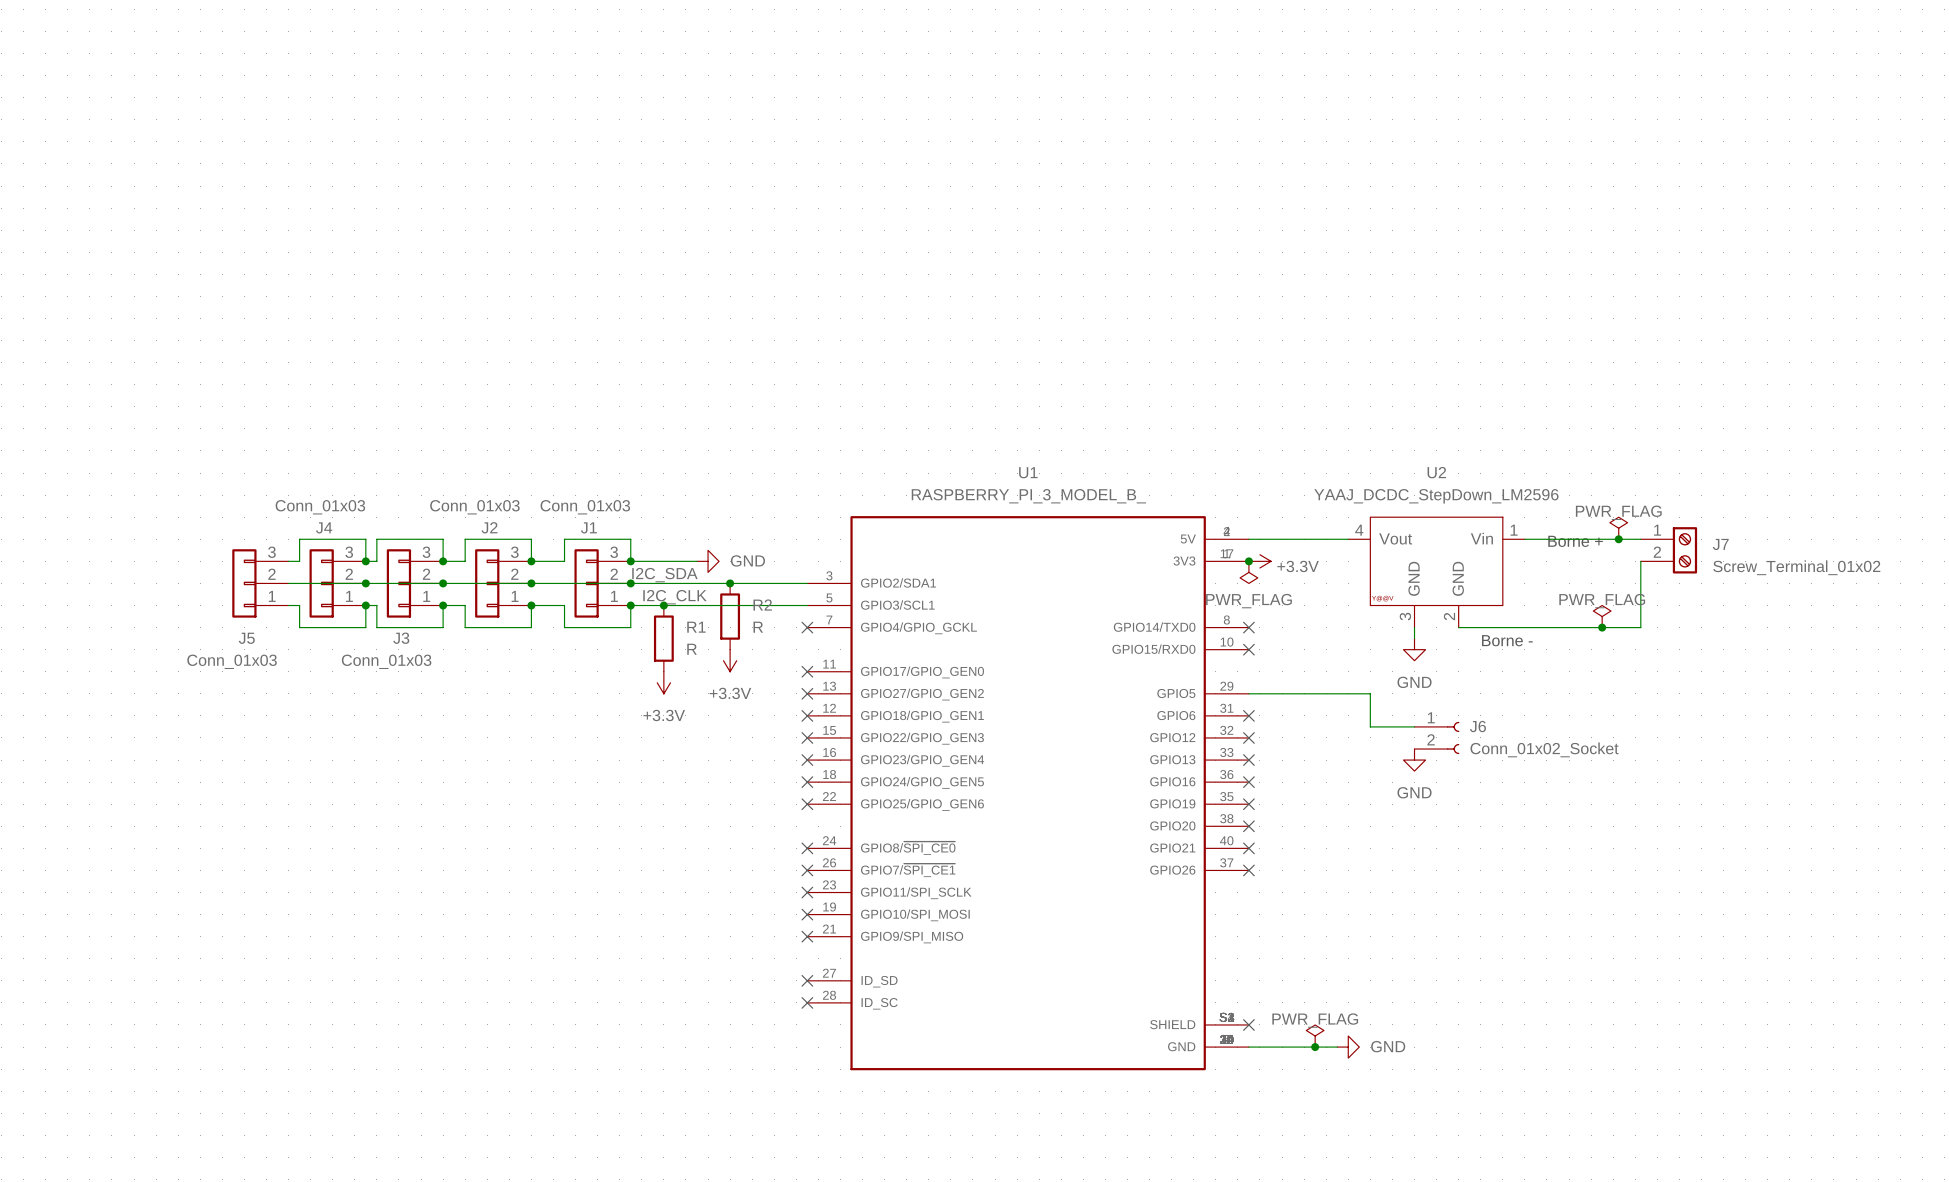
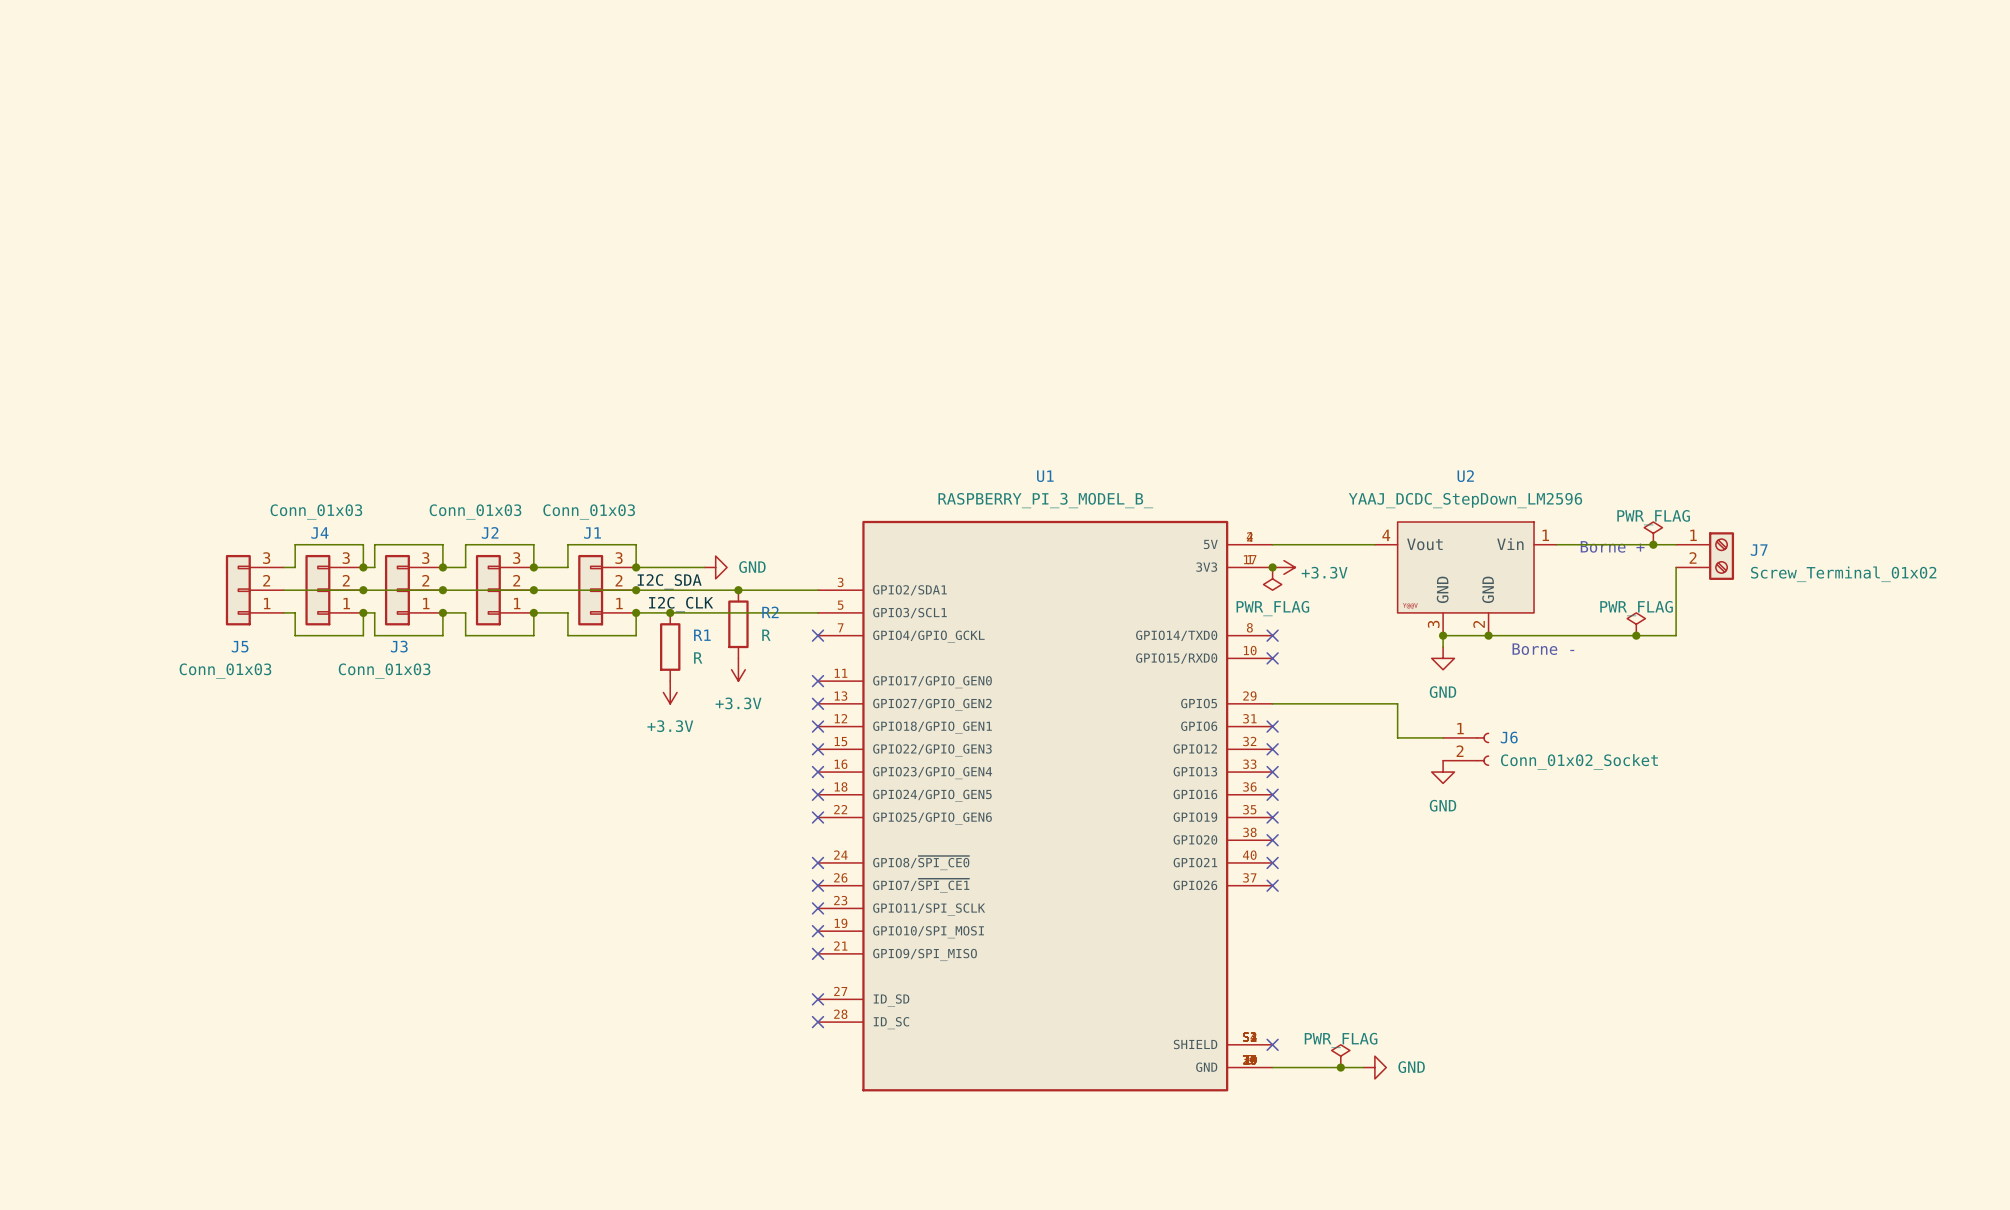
wire: none -> (1443, 635) (1488, 635)
junction: none -> (1443, 635)
junction: none -> (1488, 635)

